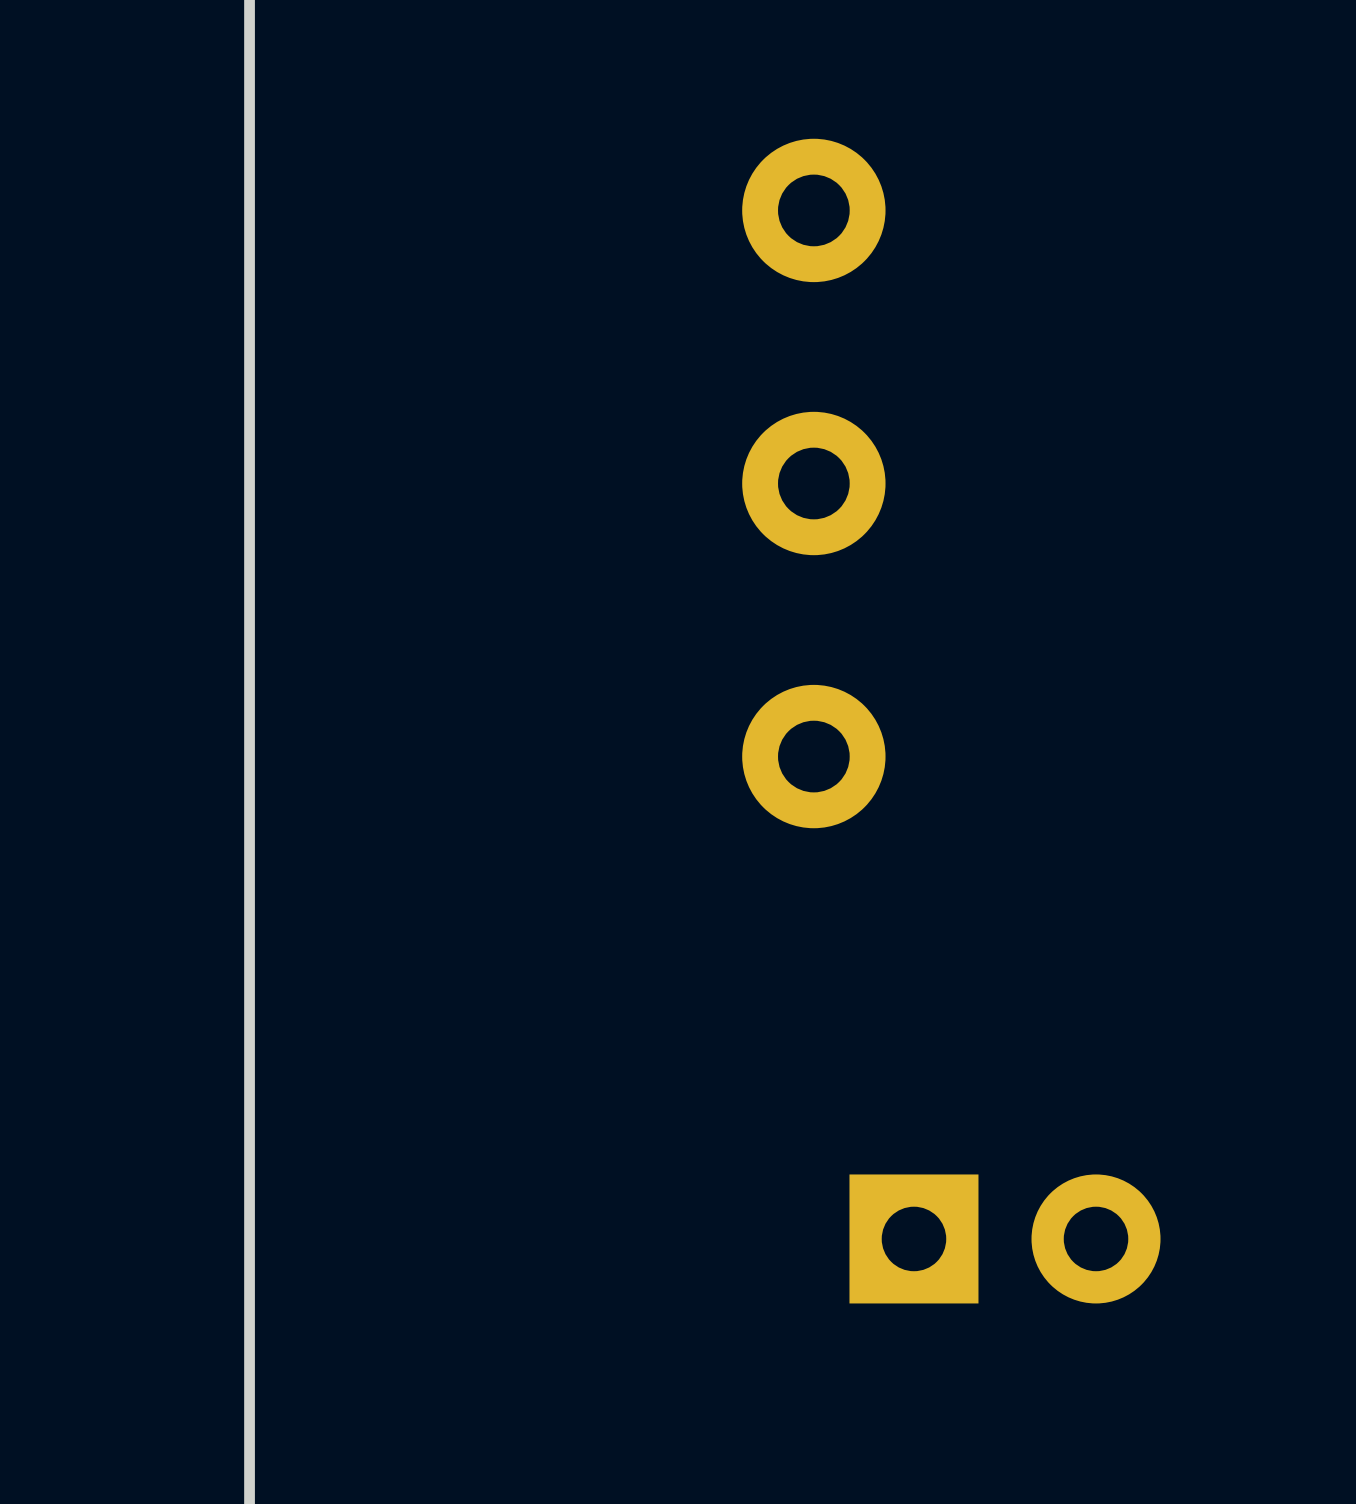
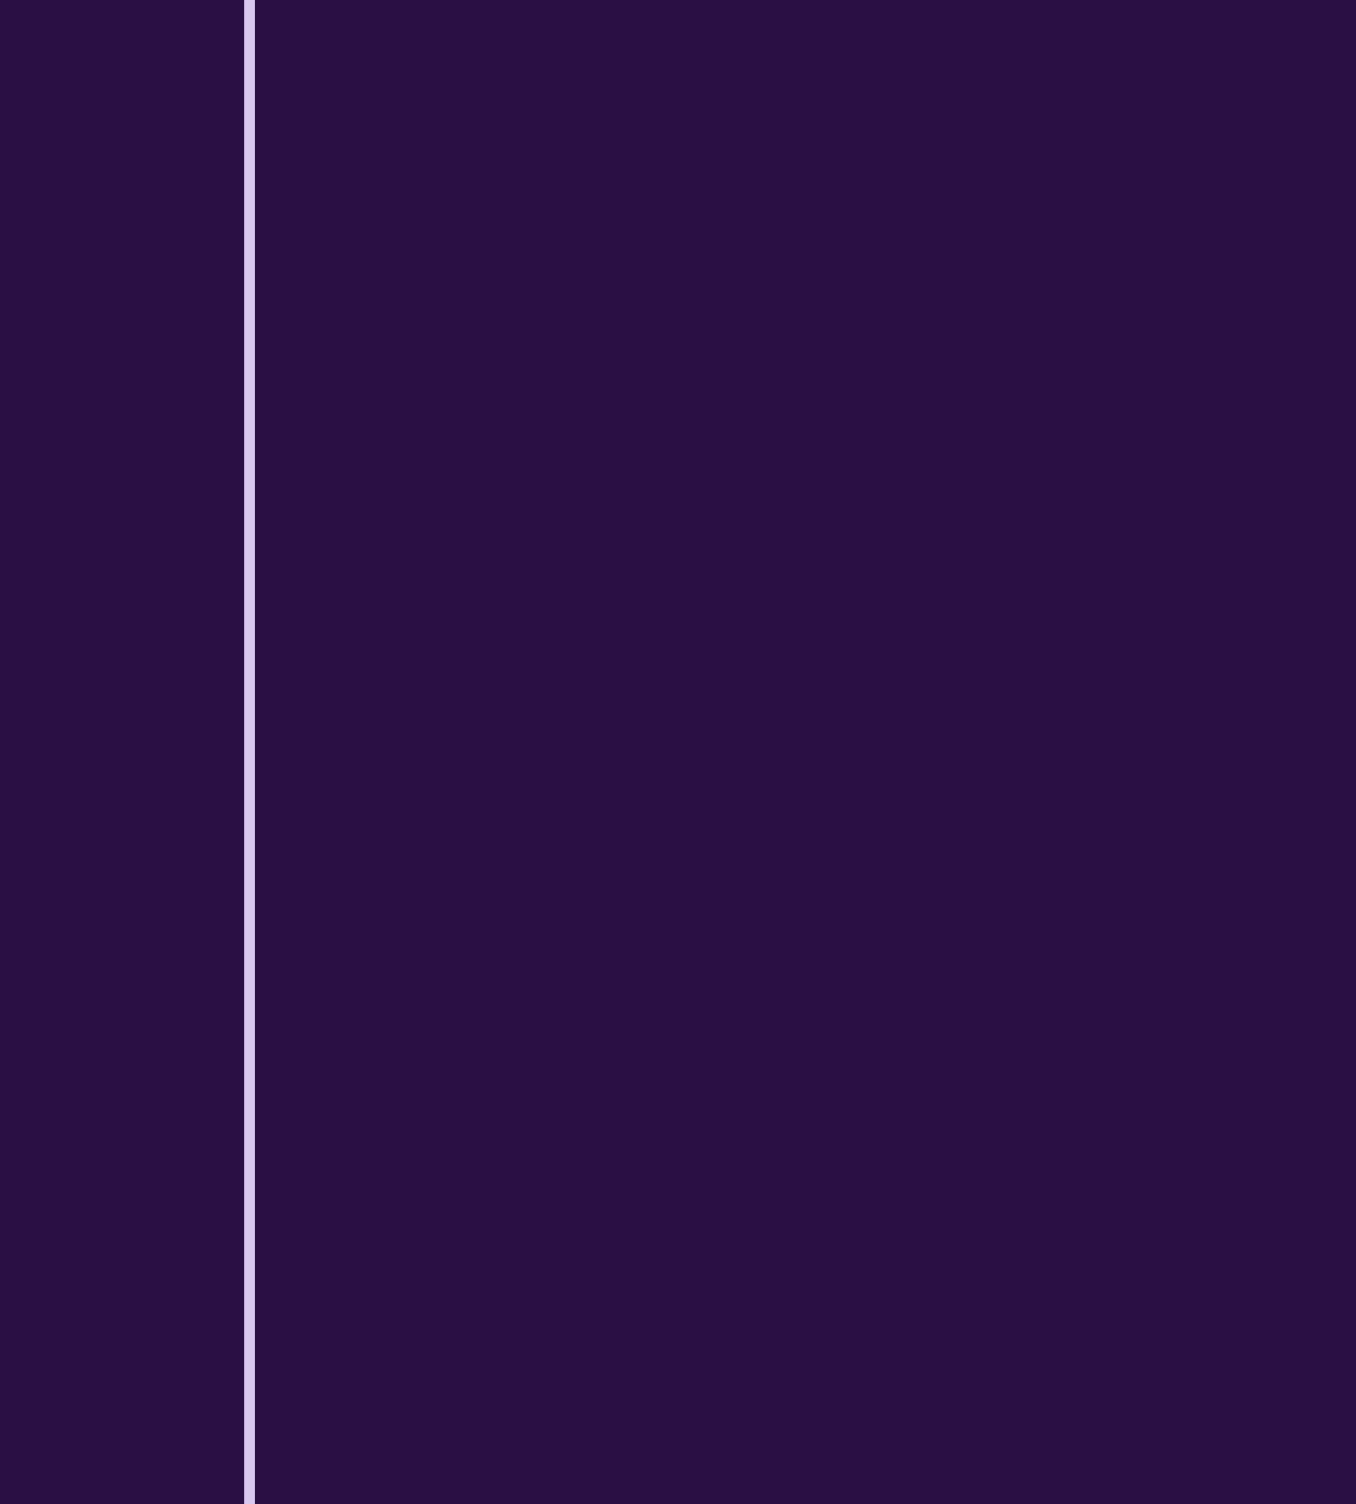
part: (813, 483) -> none
part: (1004, 1238) -> none

